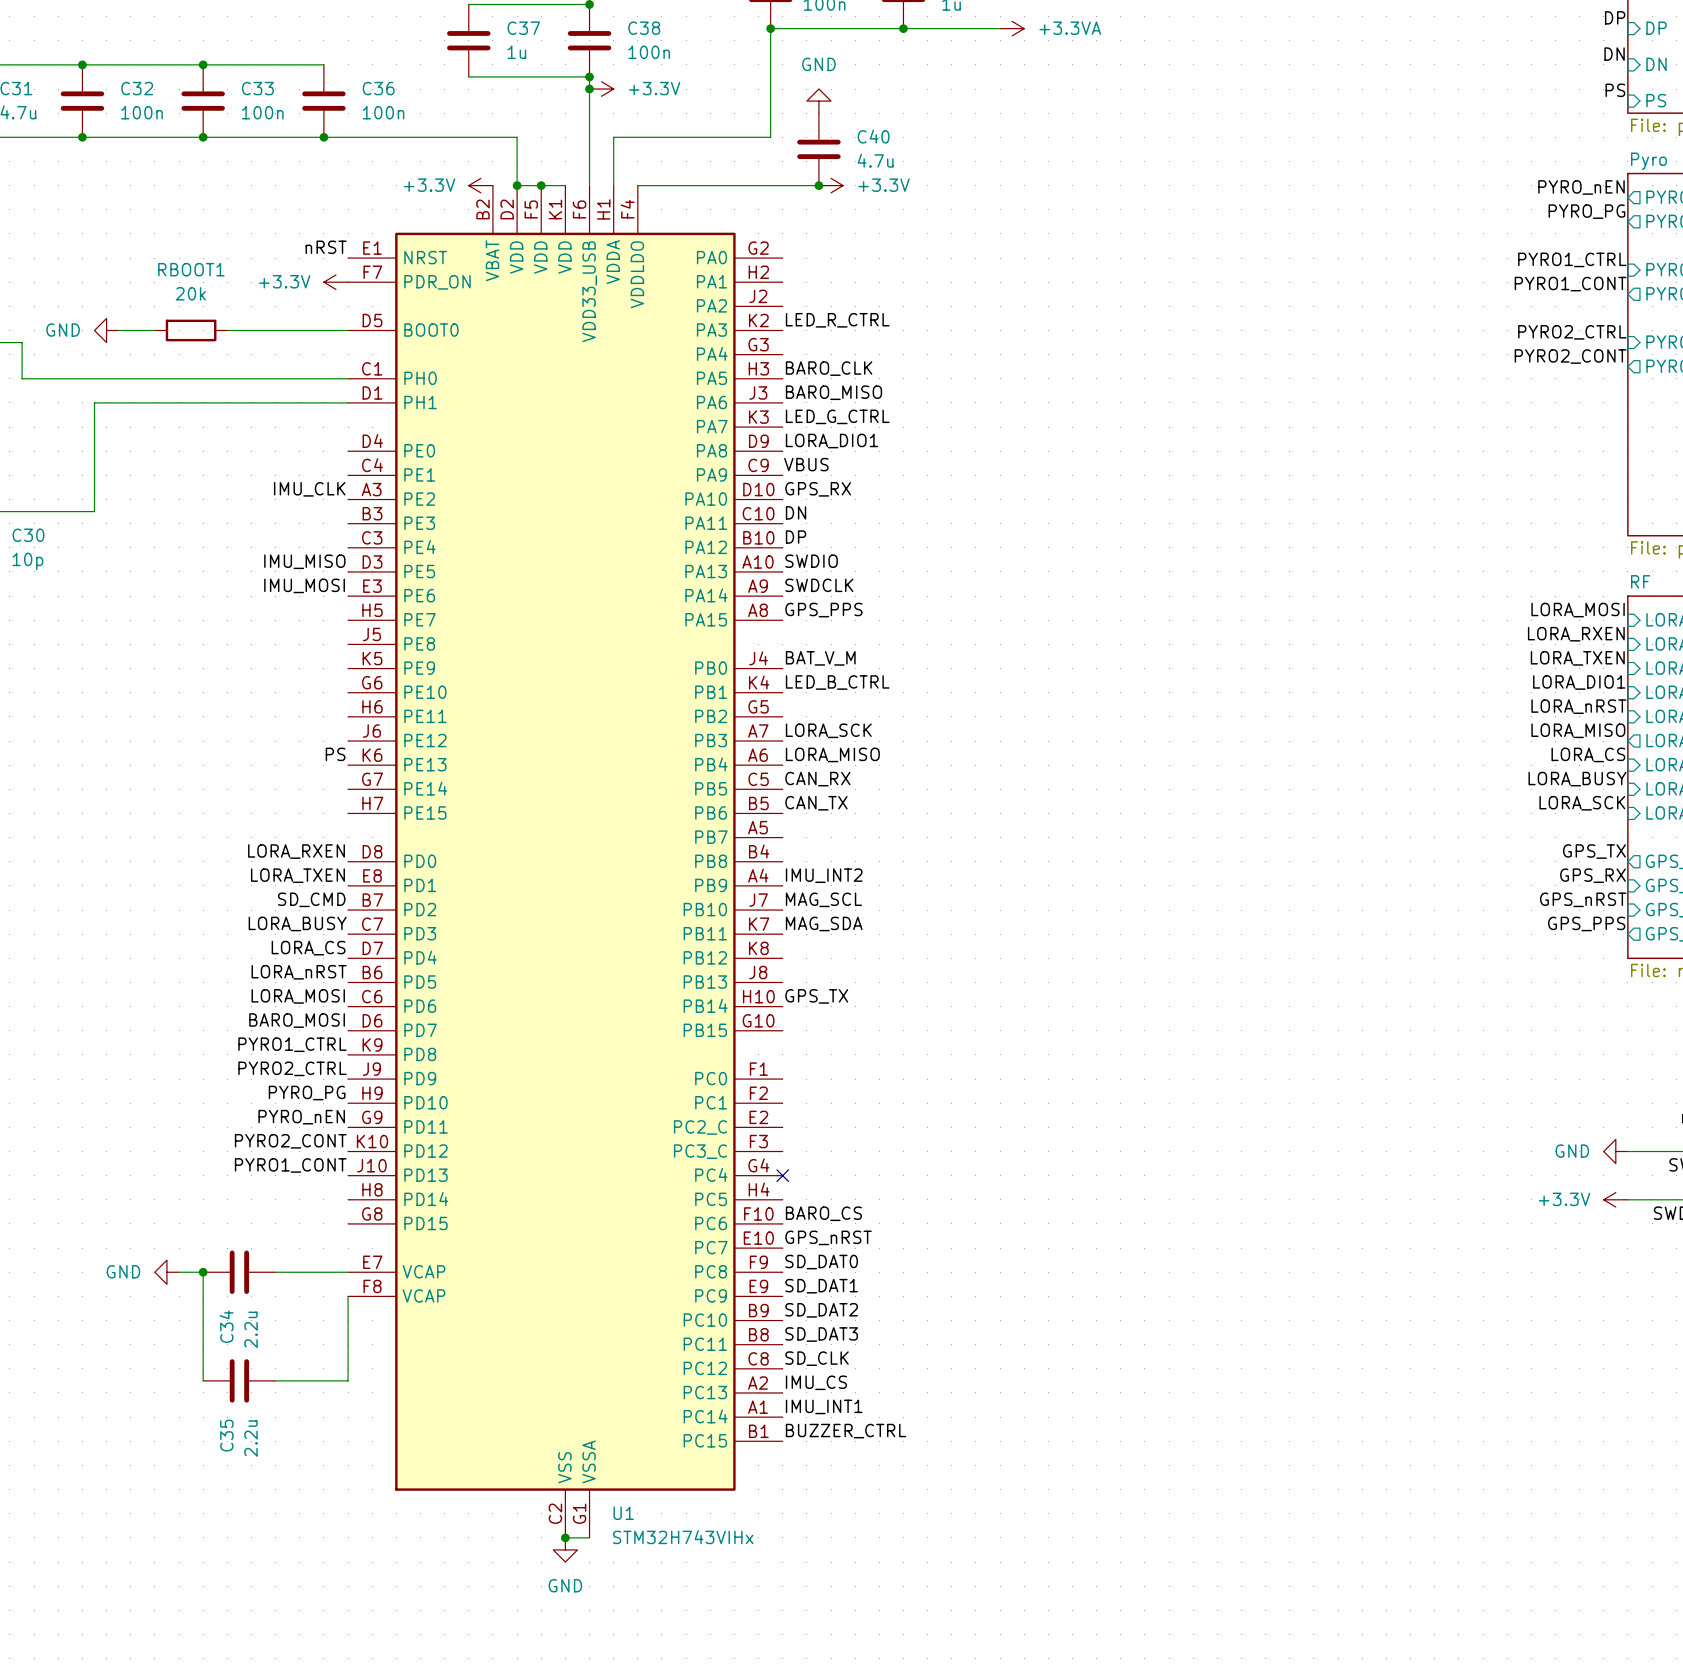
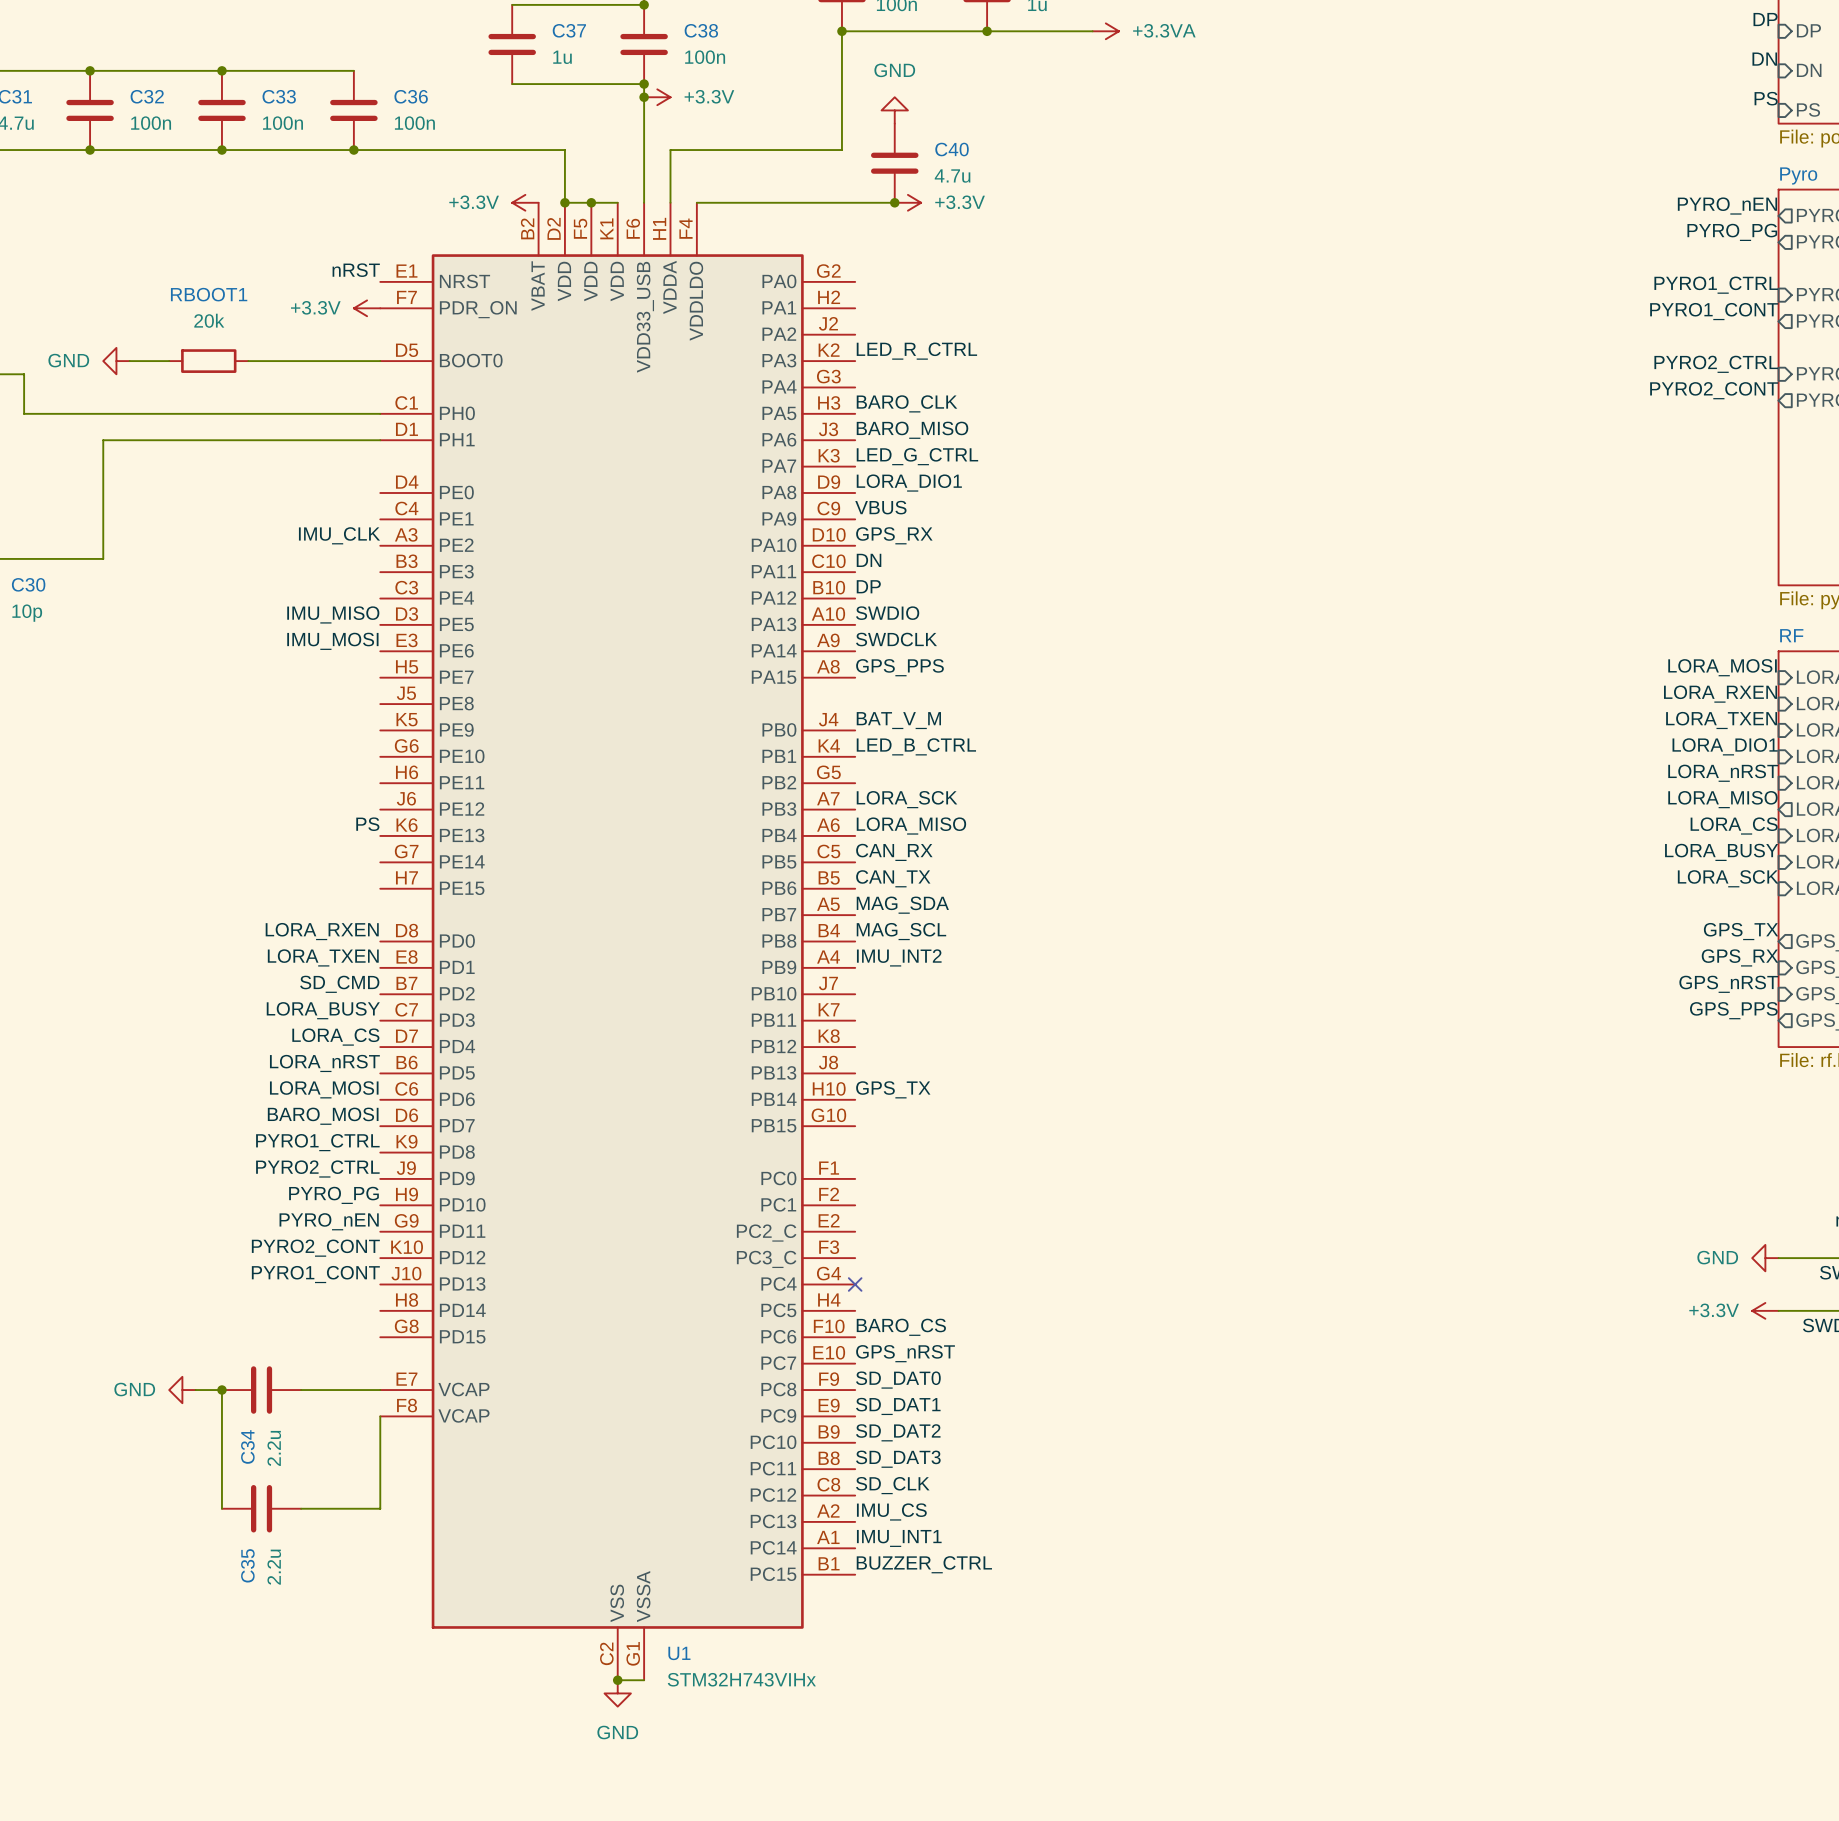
label position: MAG_SCL (823, 899) -> MAG_SCL (901, 931)
label position: MAG_SDA (824, 923) -> MAG_SDA (902, 905)

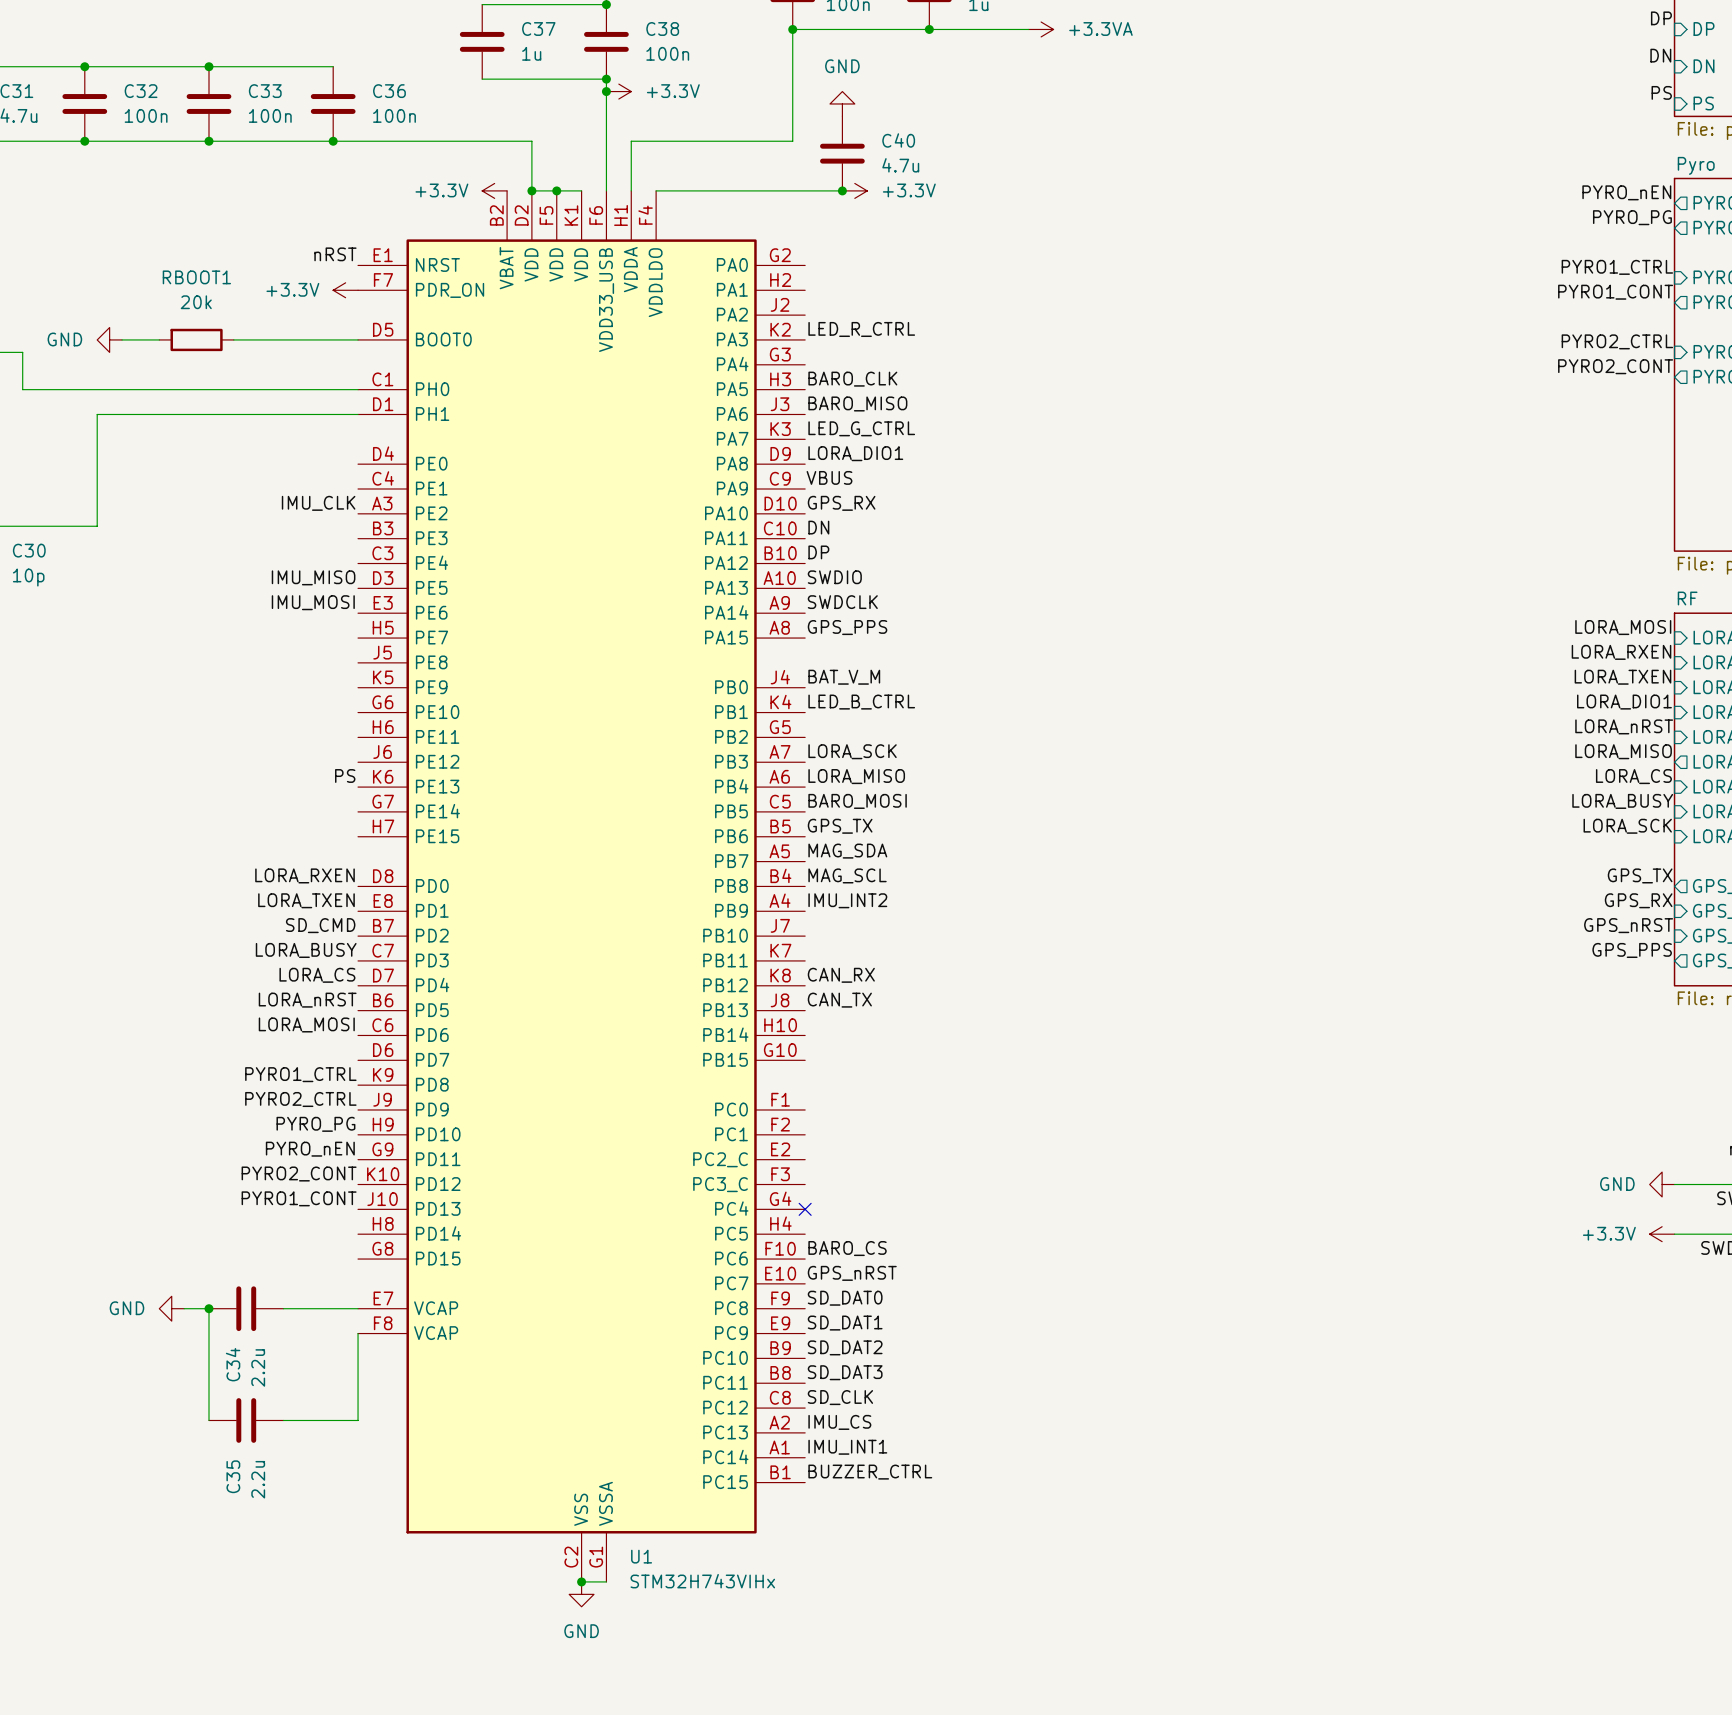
label: CAN_RX (894, 852) -> BARO_MOSI (857, 801)
label: CAN_TX (893, 878) -> GPS_TX (840, 826)
label: none -> CAN_RX (841, 975)
label: none -> CAN_TX (839, 1000)
label: GPS_TX (893, 1089) -> none
label: BARO_MOSI (323, 1116) -> none

